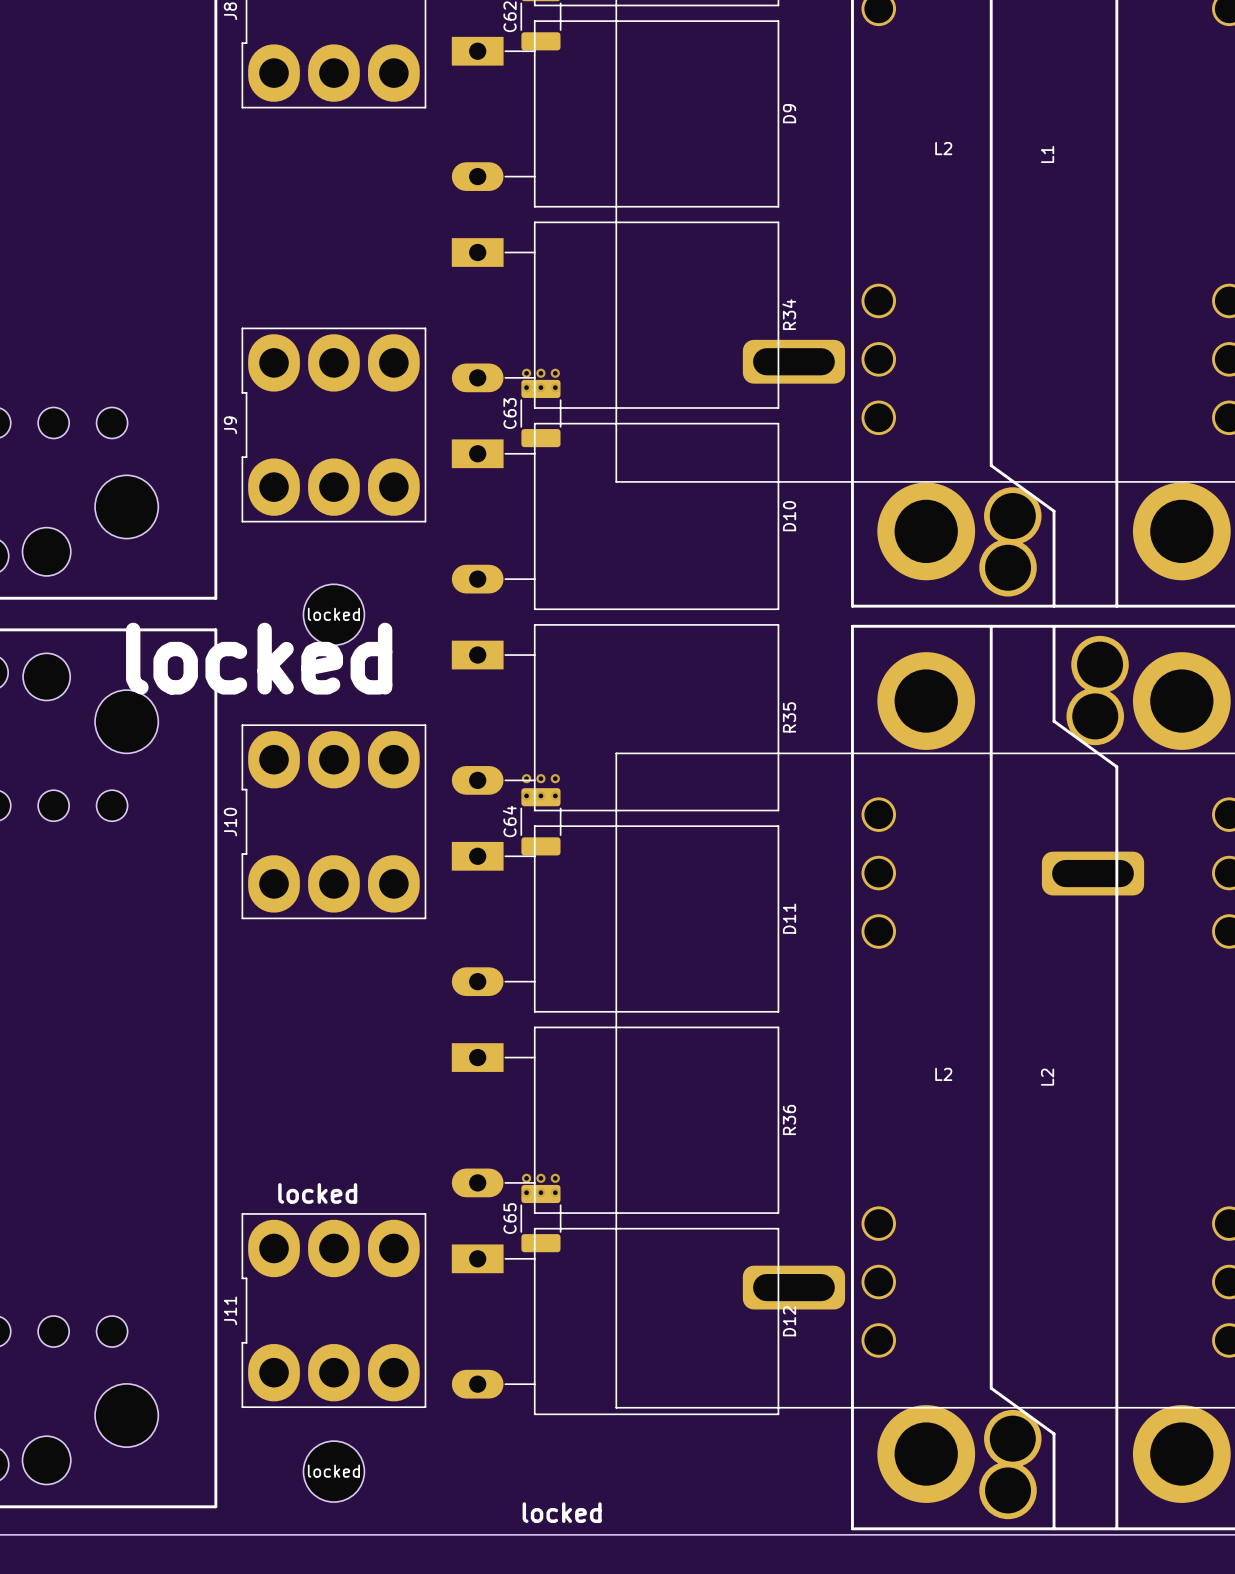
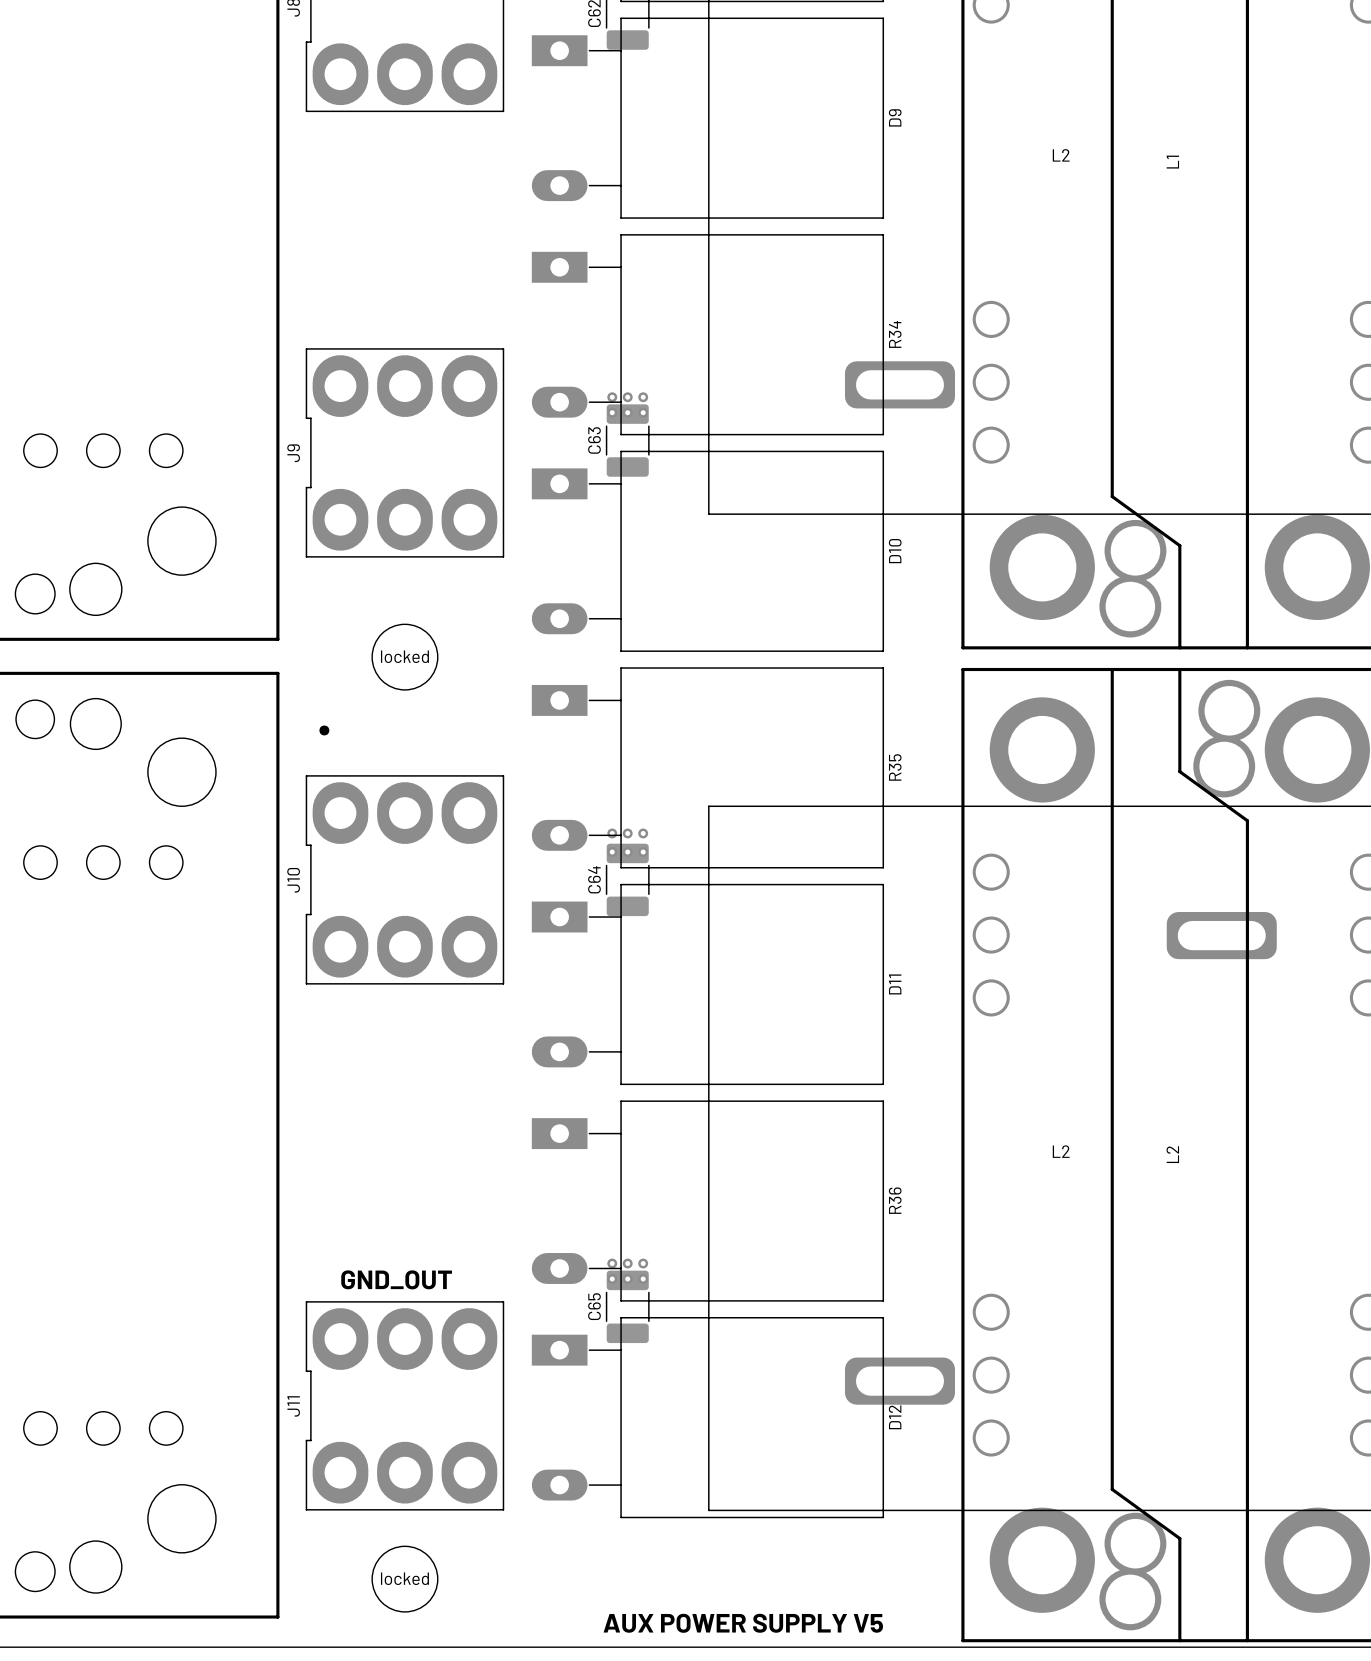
text: locked (259, 658) -> . (324, 730)
text: locked (317, 1193) -> GND_OUT (396, 1279)
text: locked (562, 1512) -> AUX POWER SUPPLY V5 (743, 1623)

